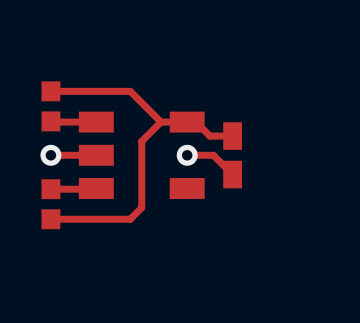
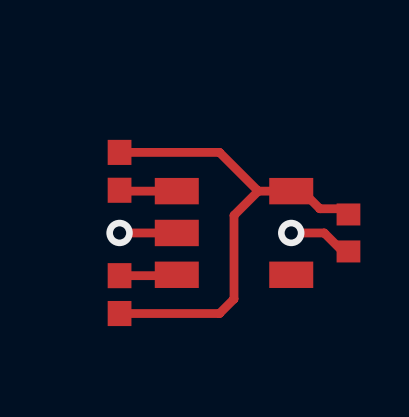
part footprint: [223, 122, 243, 189] -> [336, 203, 361, 263]

